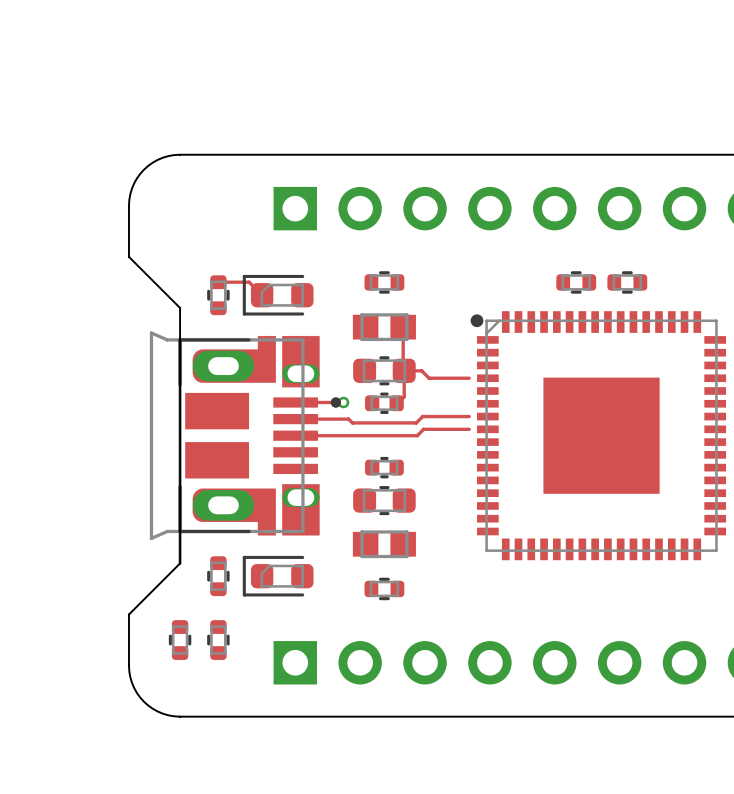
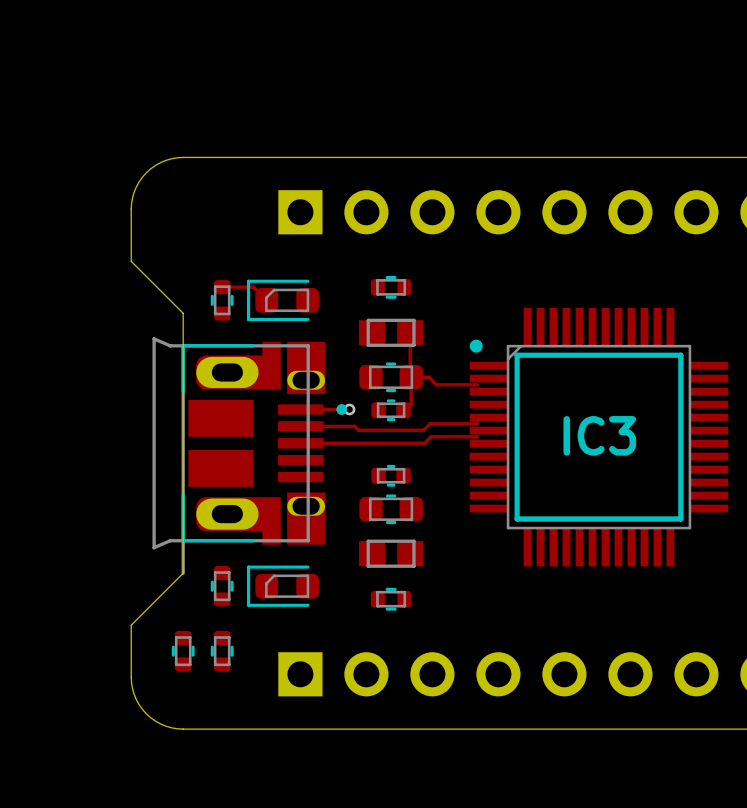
part: (576, 282) -> none
part: (627, 282) -> none
IC3: none -> (598, 437)
part: (598, 435) -> none

